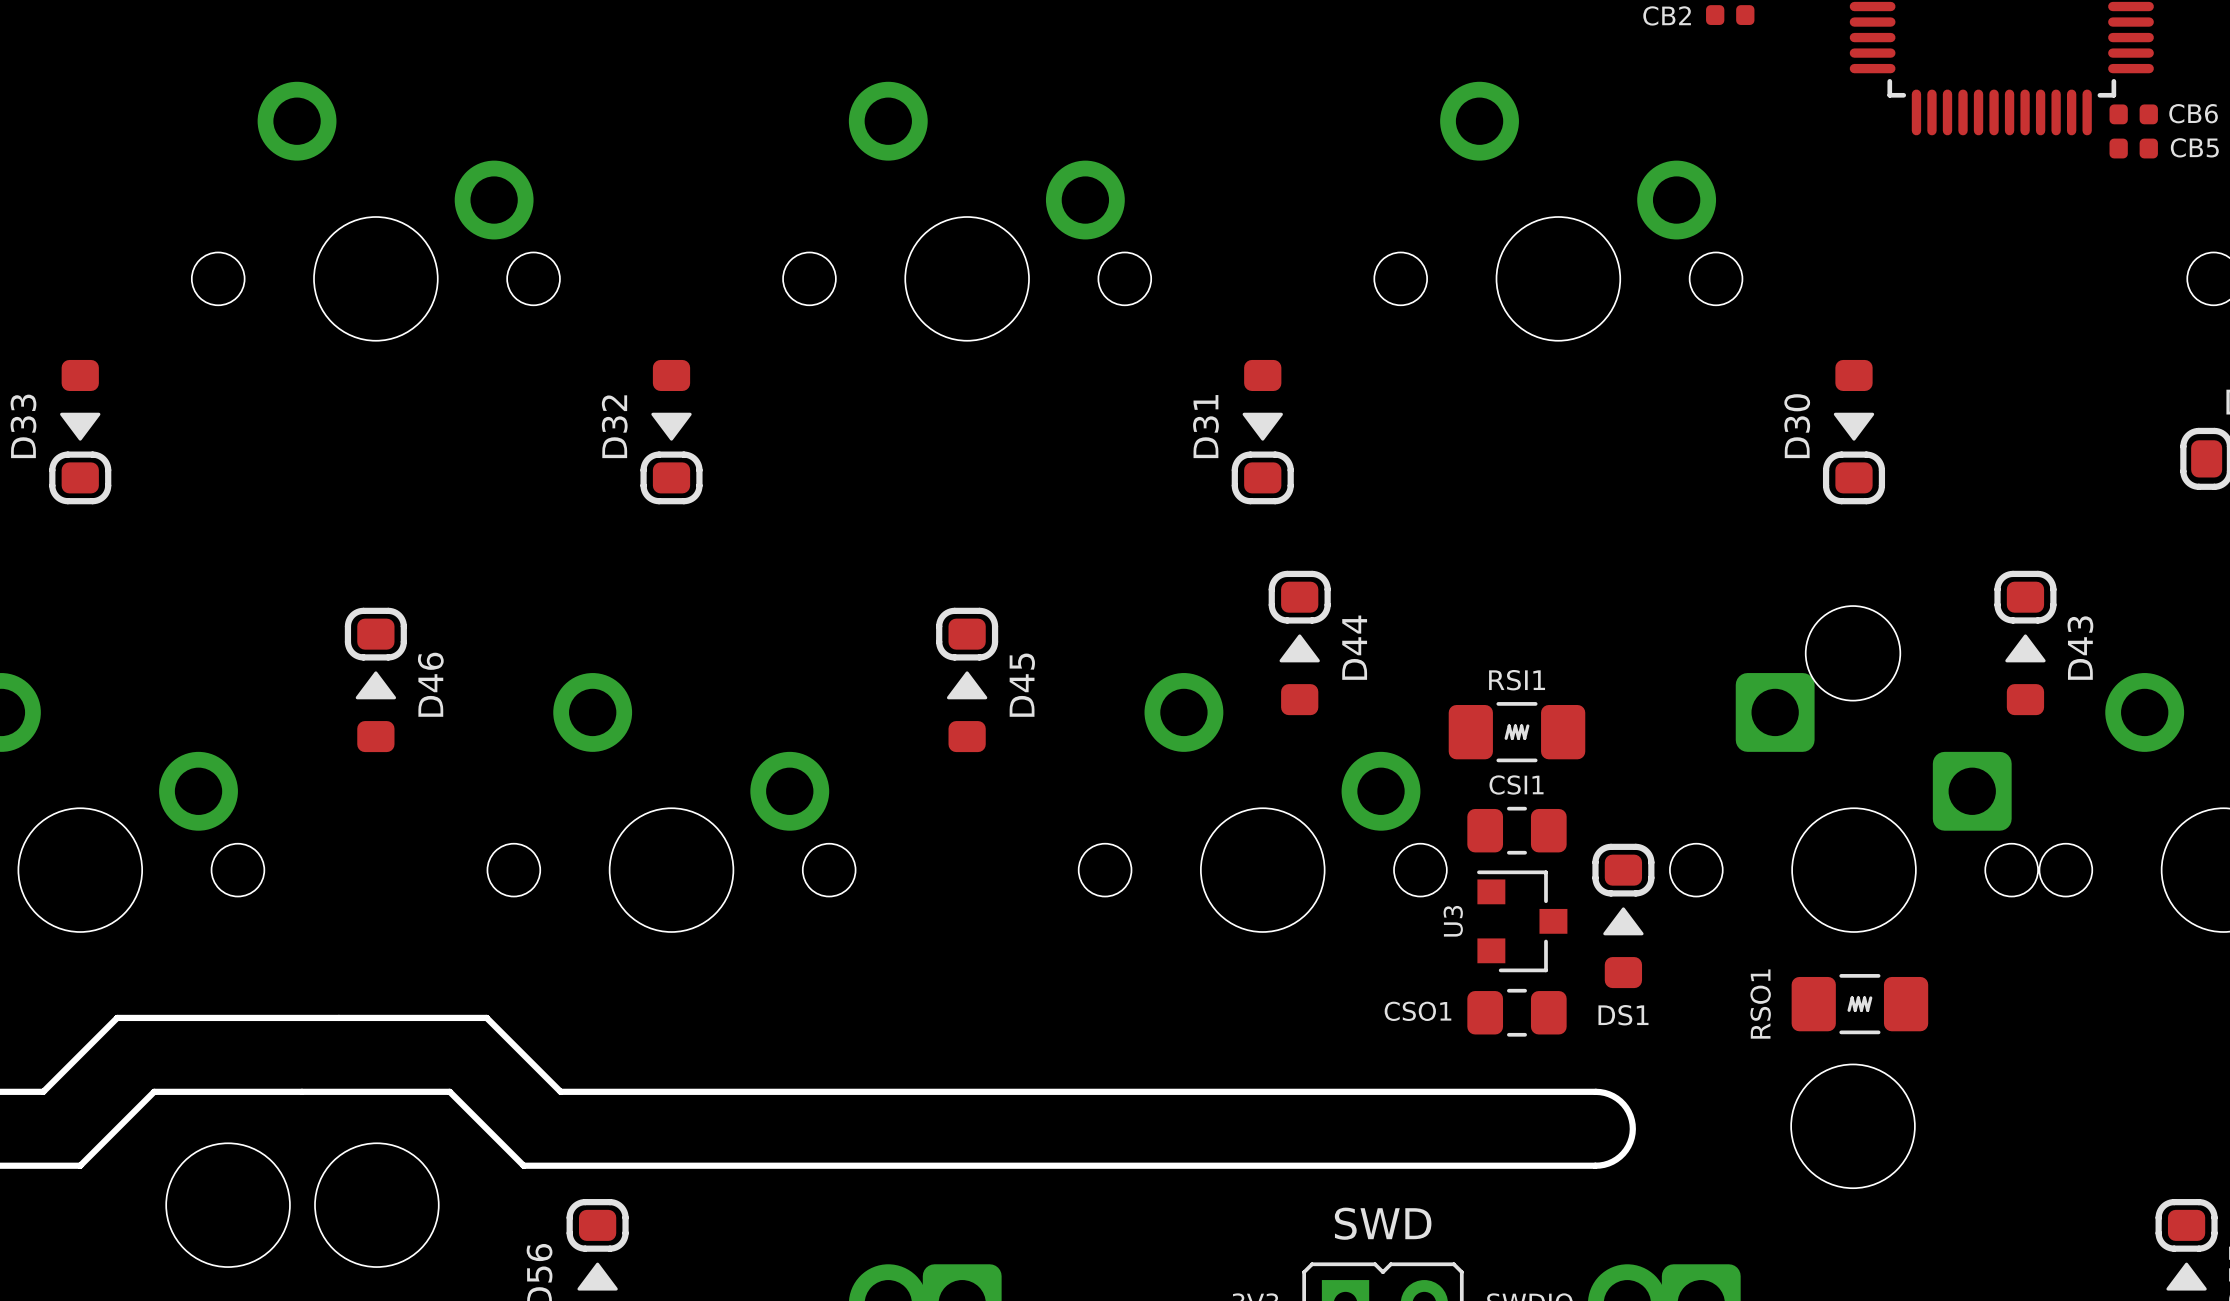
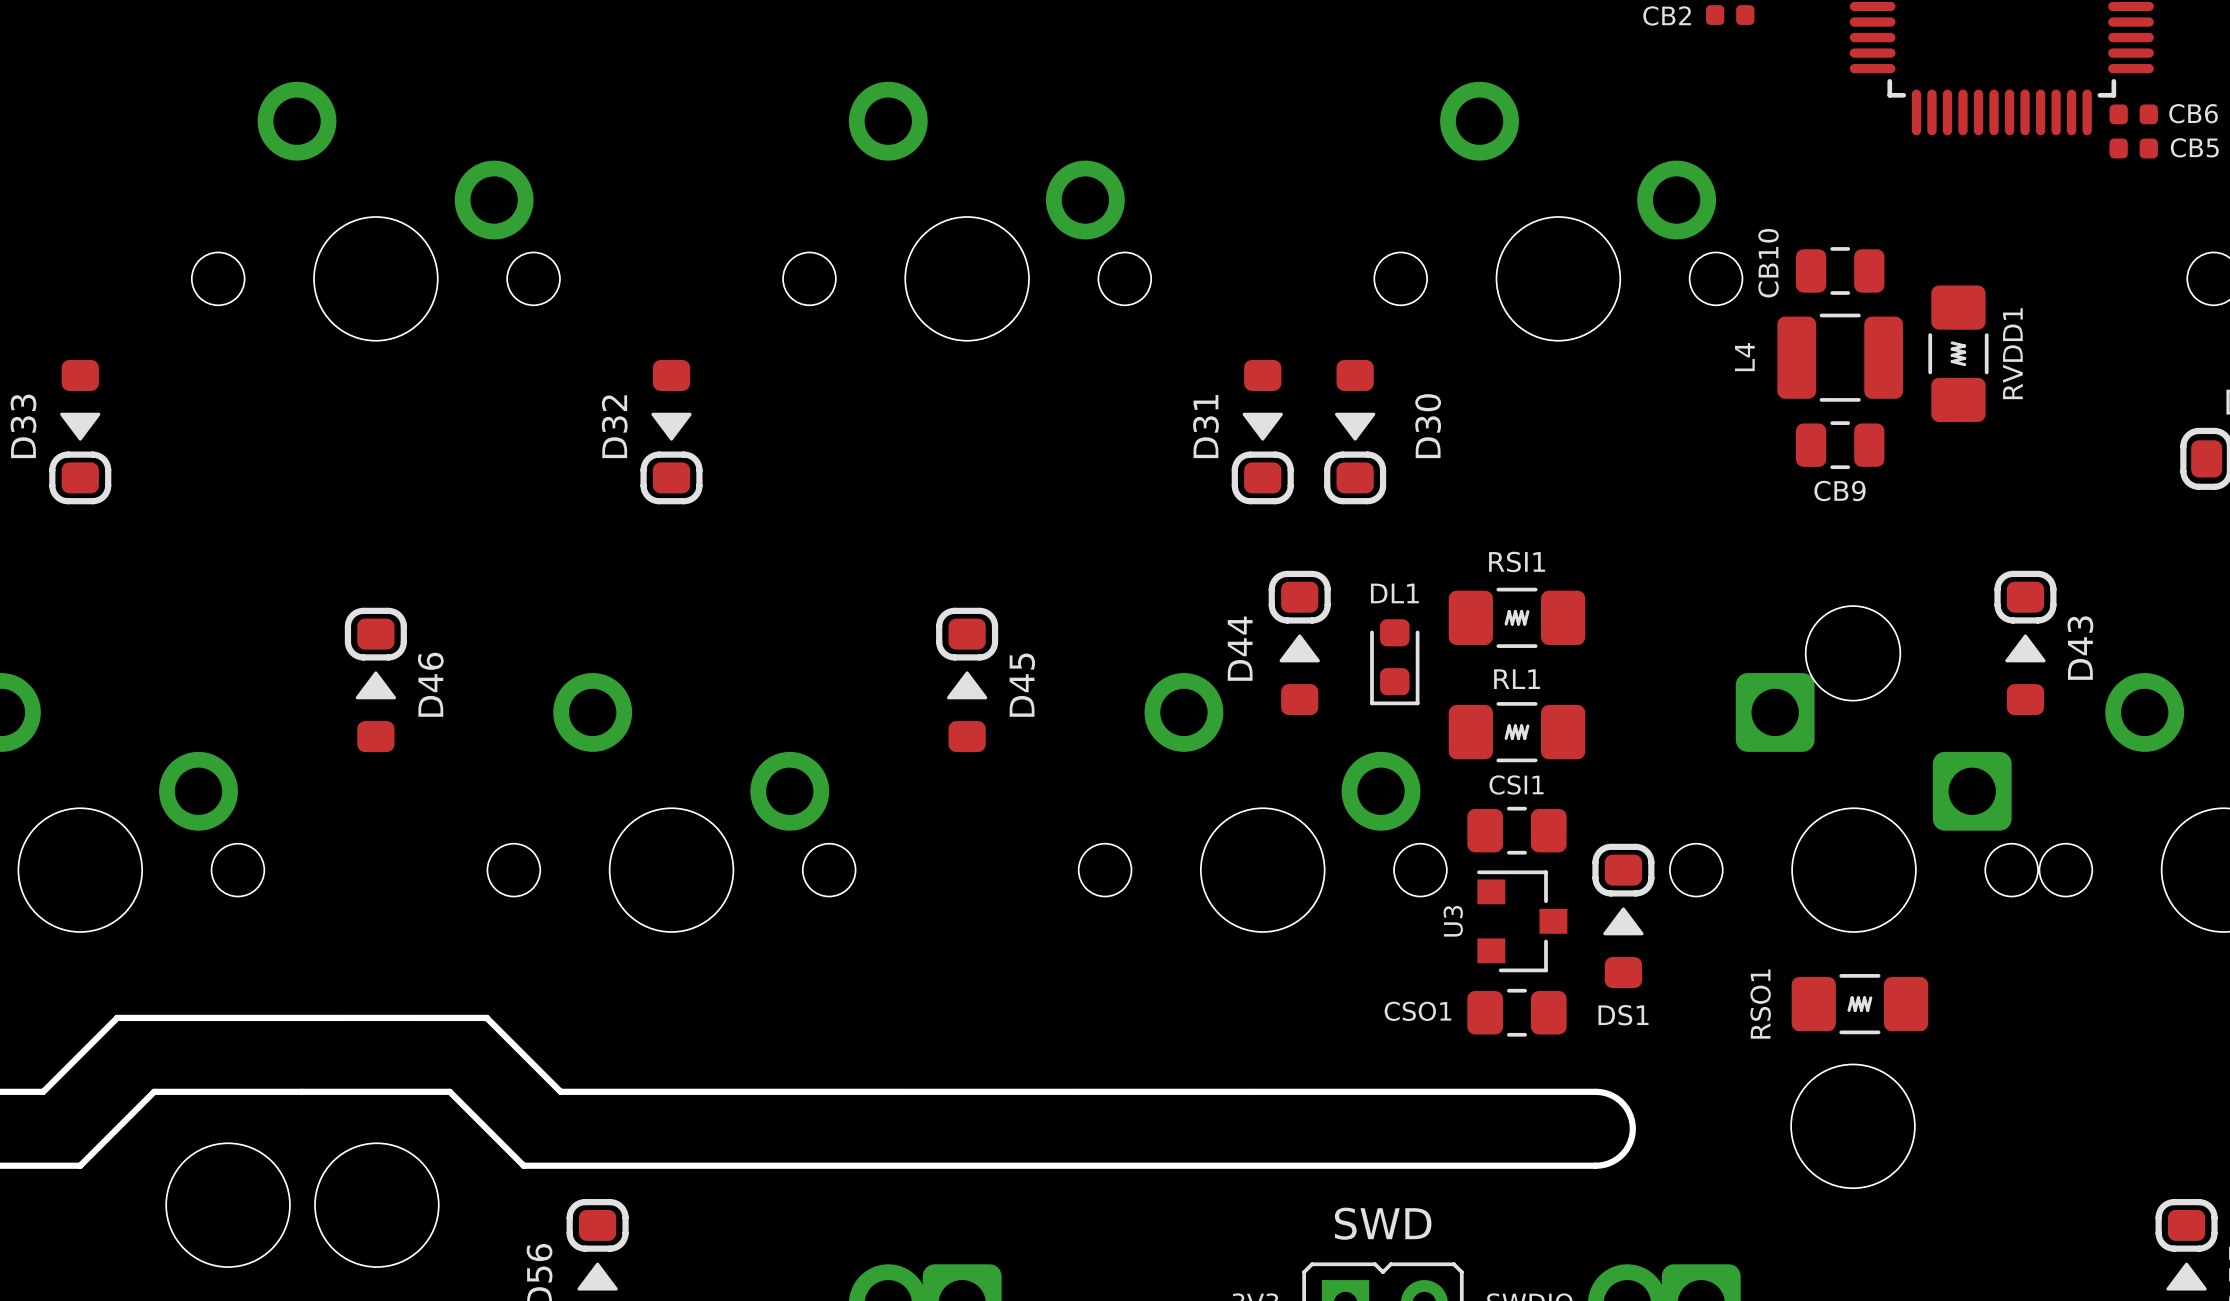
CB10: none -> (1840, 270)
RVDD1: none -> (1958, 353)
L4: none -> (1840, 357)
D30 name position: D30 (1797, 426) -> D30 (1428, 426)
D30 position: (1853, 432) -> (1355, 432)
CB9: none -> (1840, 445)
RL1: none -> (1516, 617)
D44 name position: D44 (1354, 647) -> D44 (1240, 648)
DL1: none -> (1394, 662)
RSI1 name position: RSI1 (1517, 680) -> RSI1 (1517, 561)

